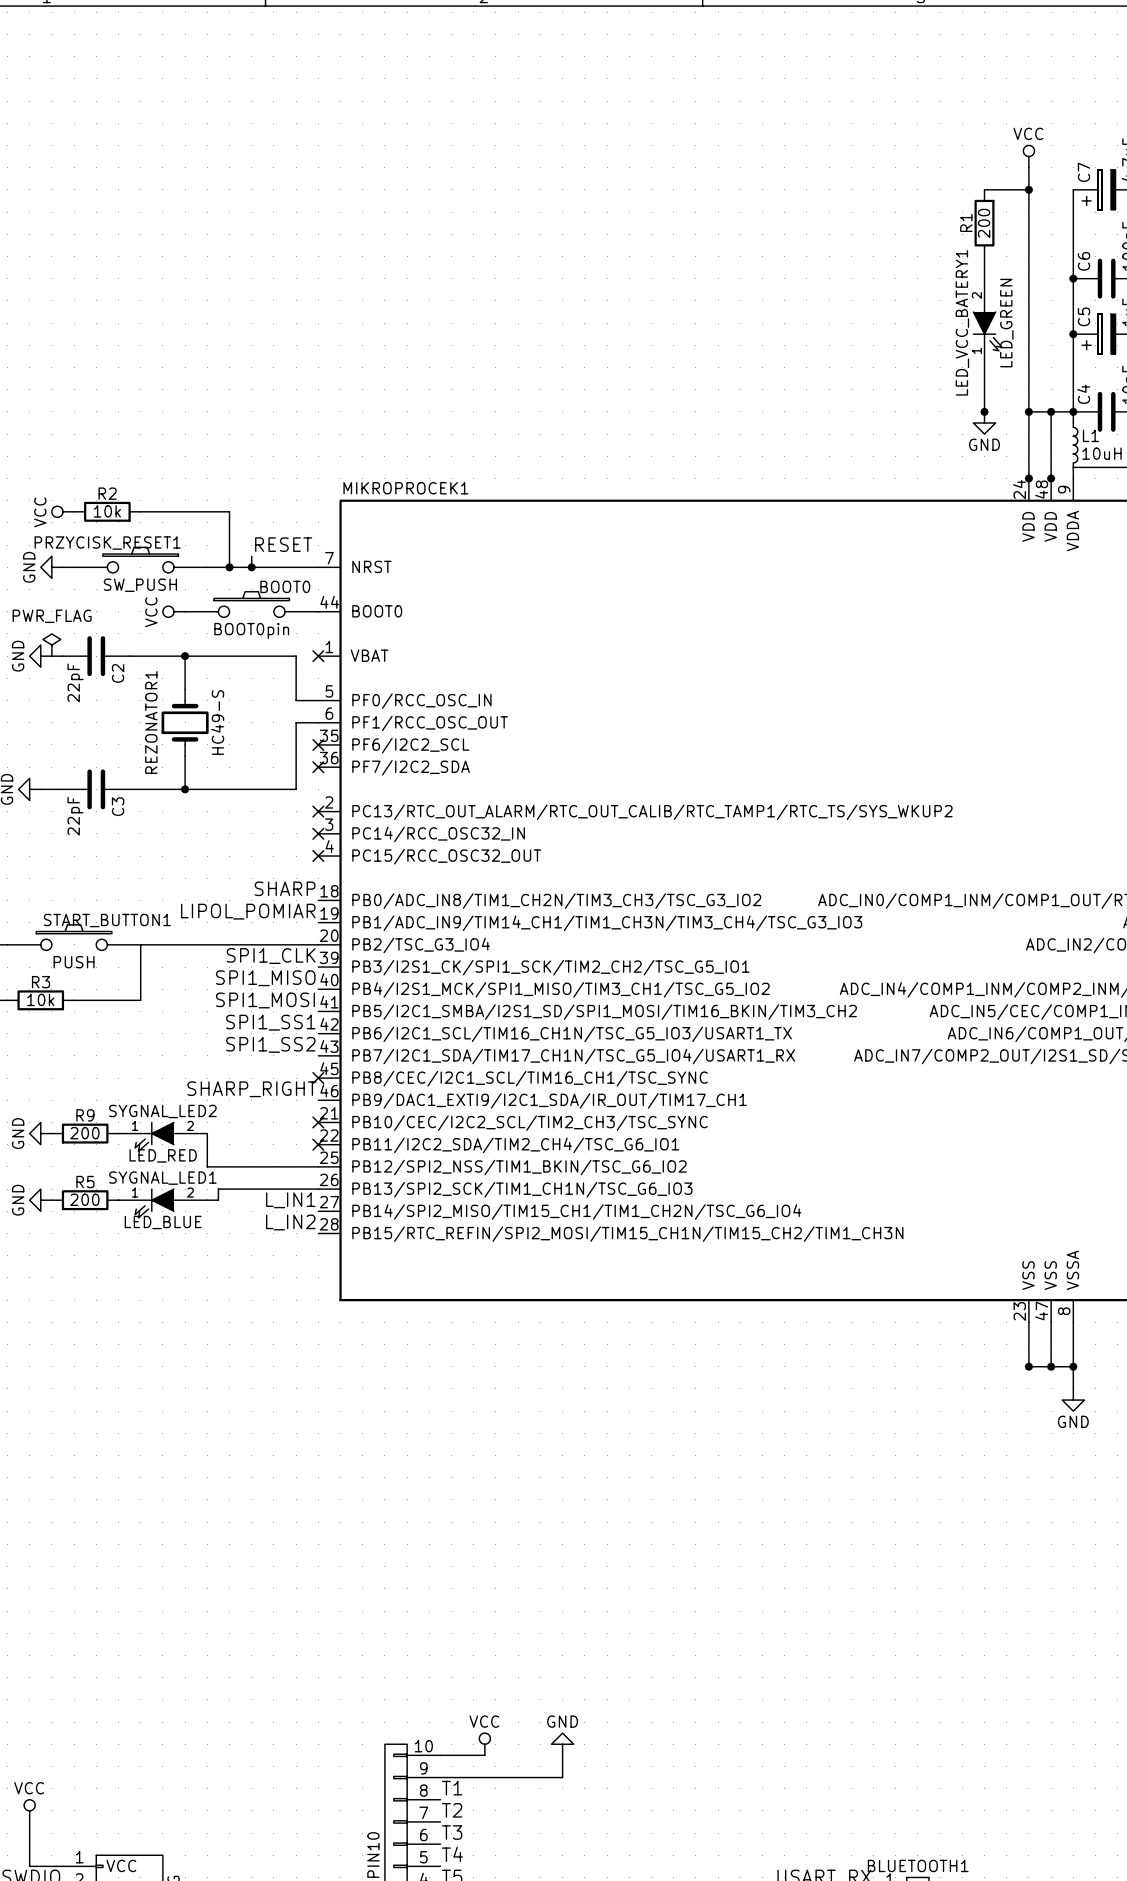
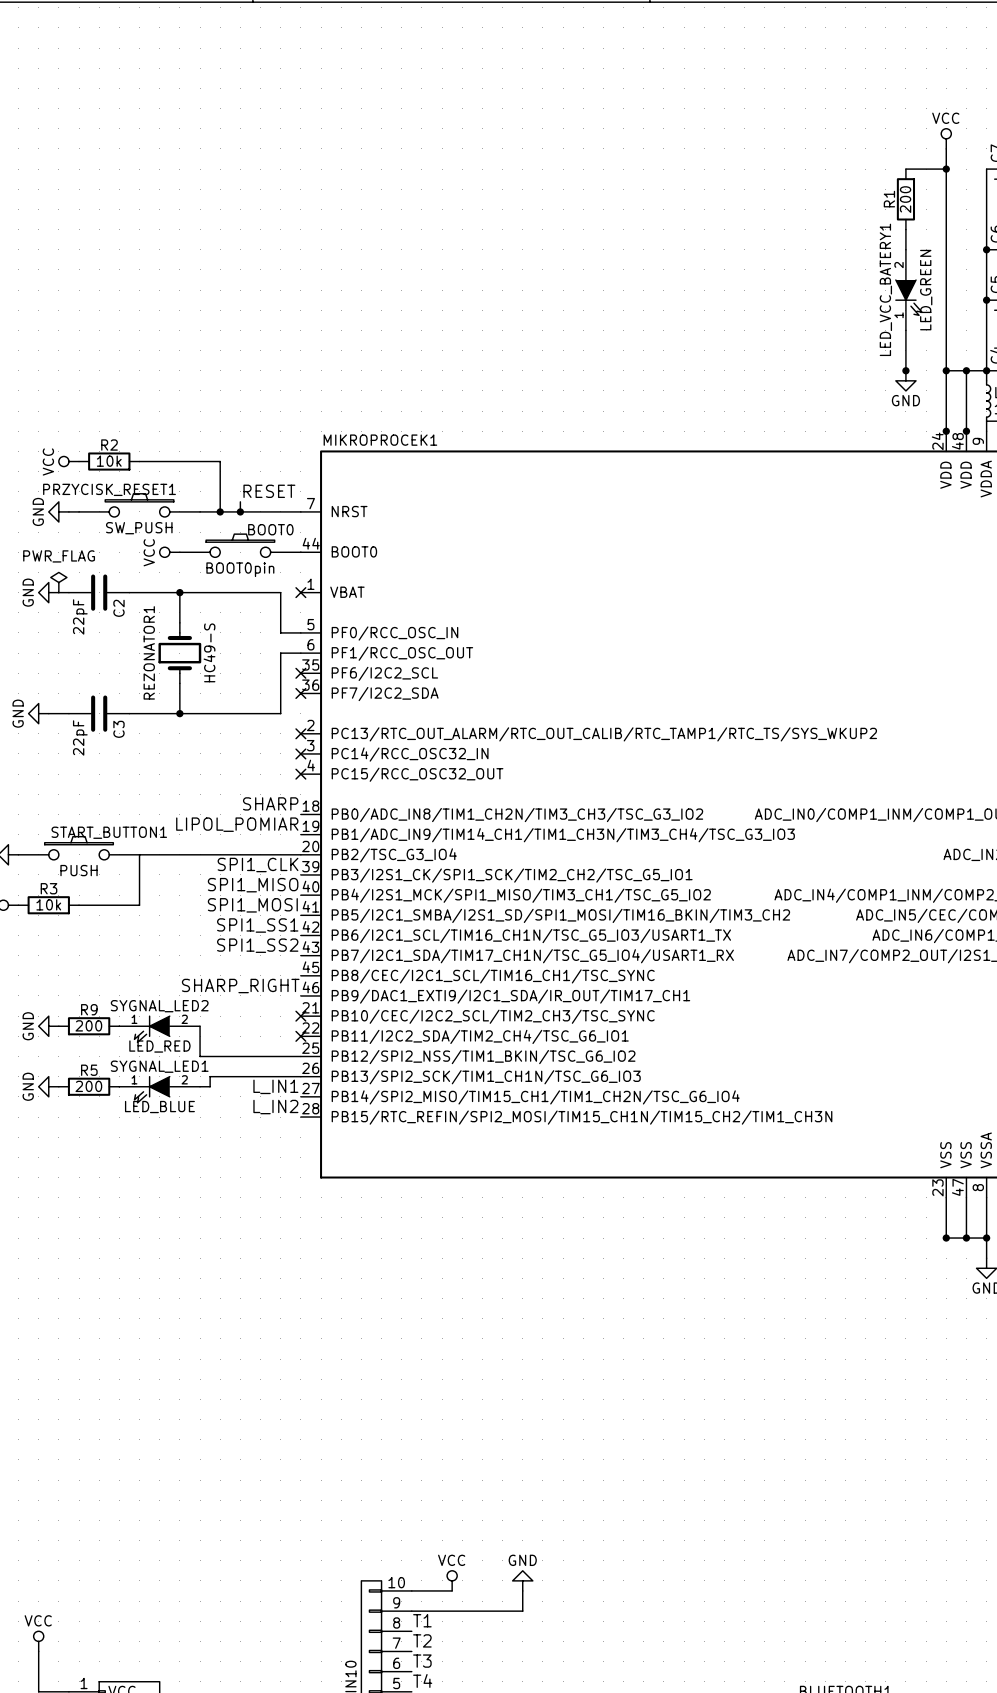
no-connect mark: (318, 1078) -> none

